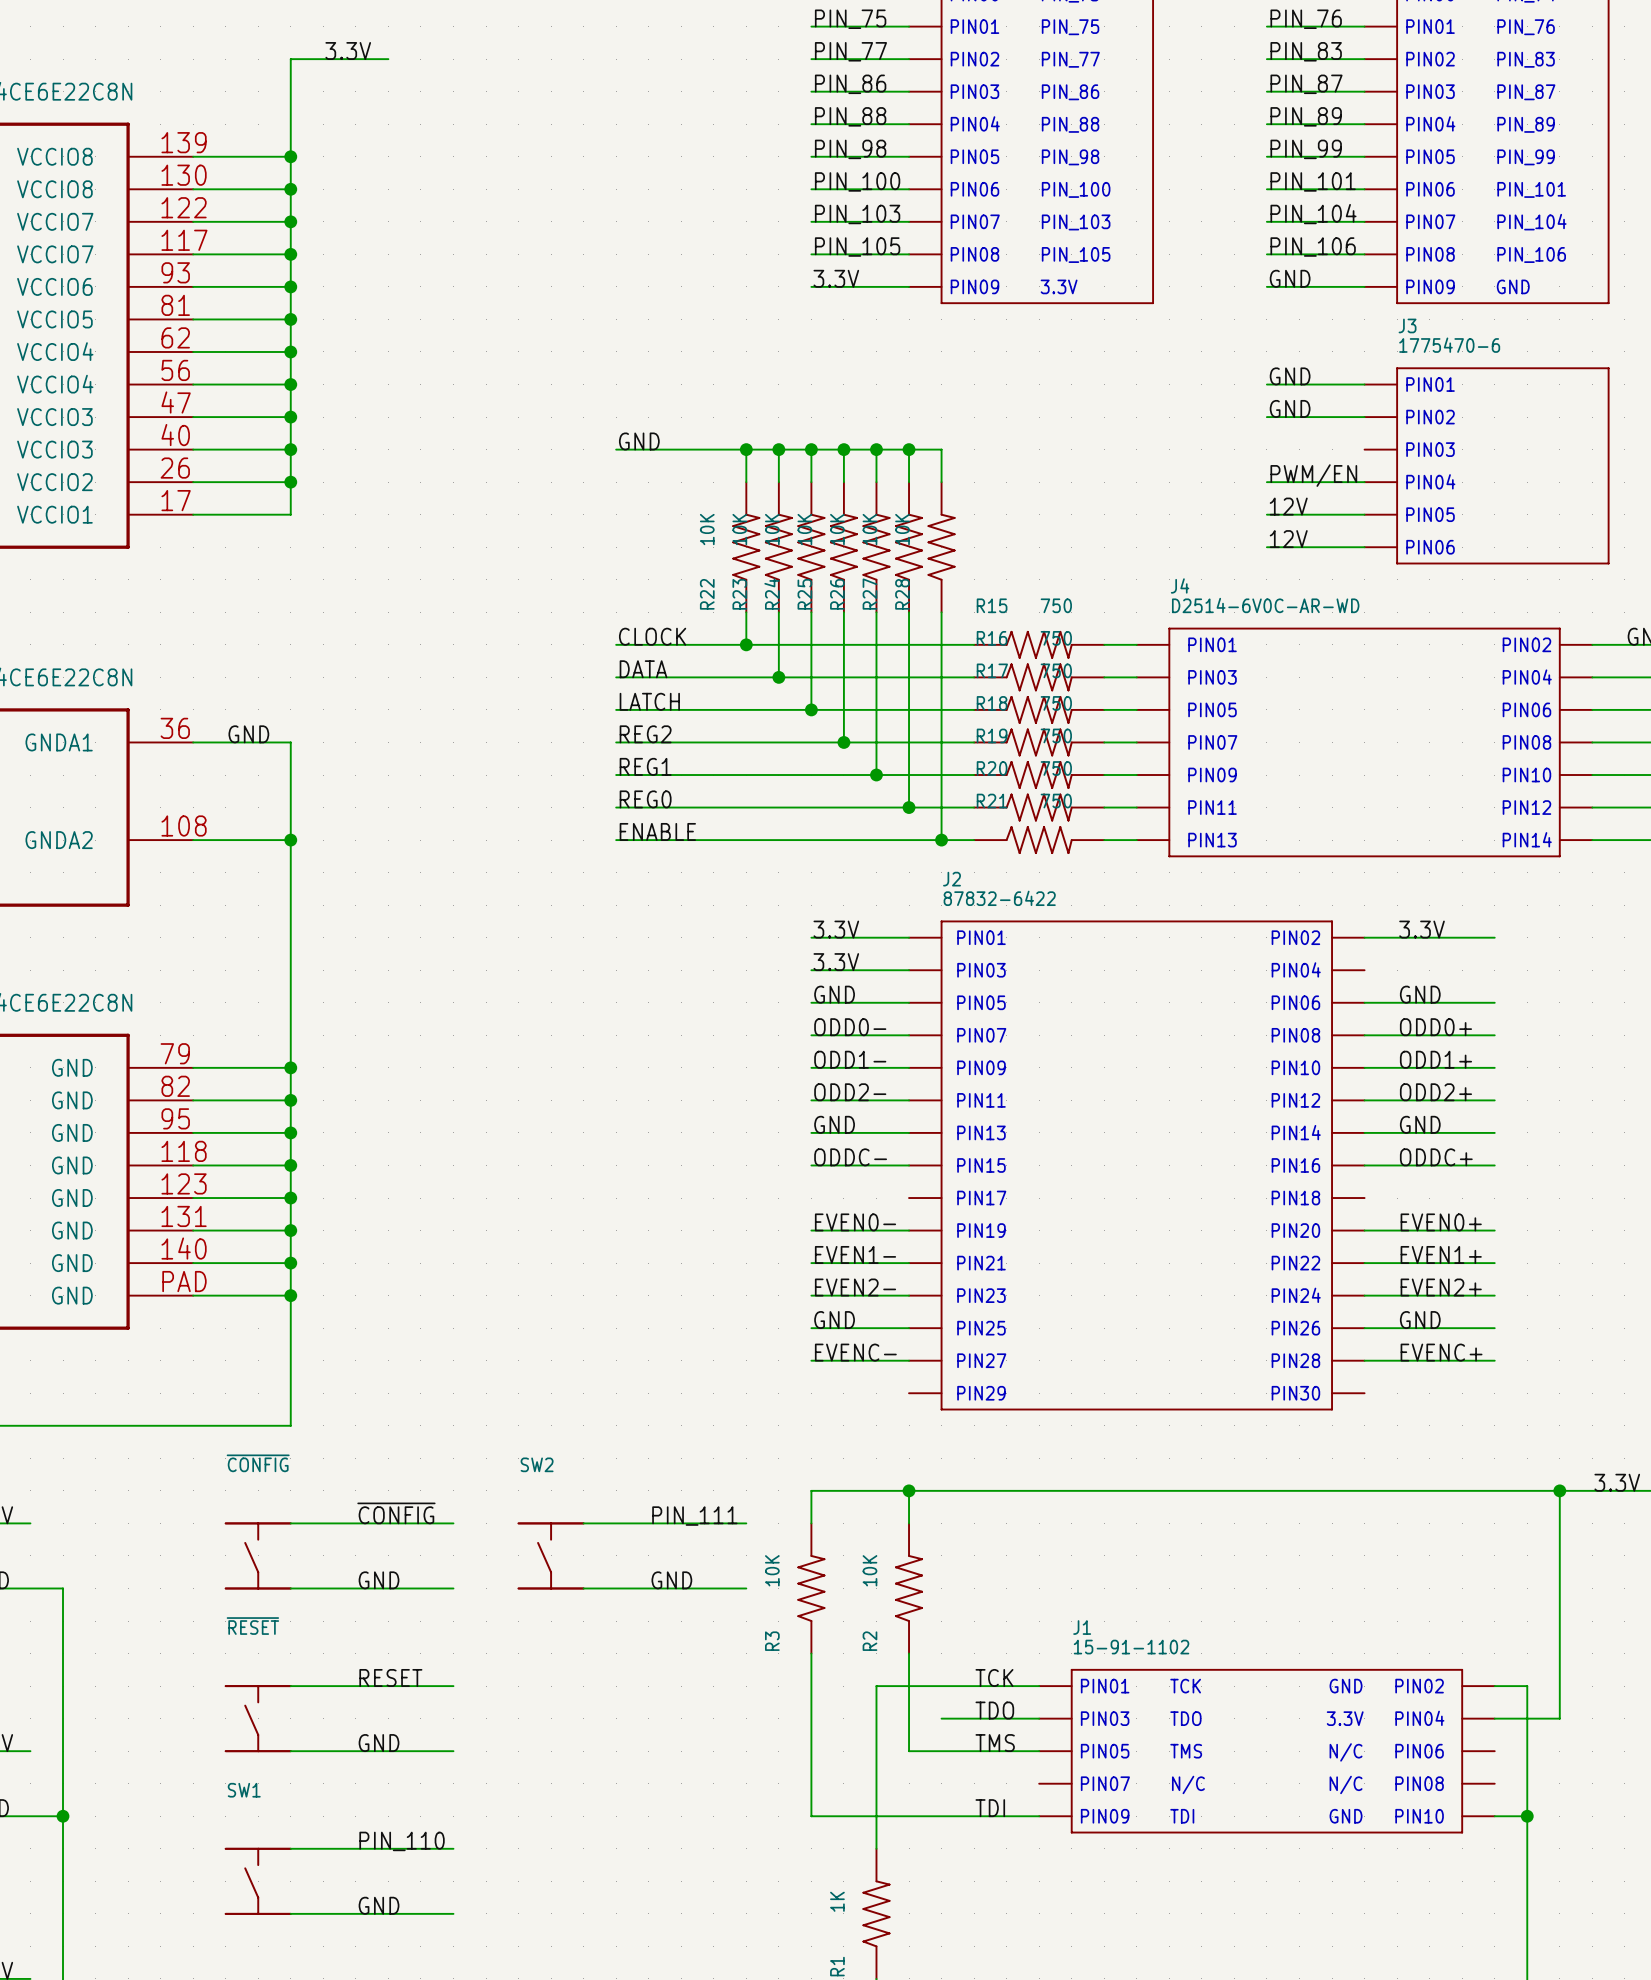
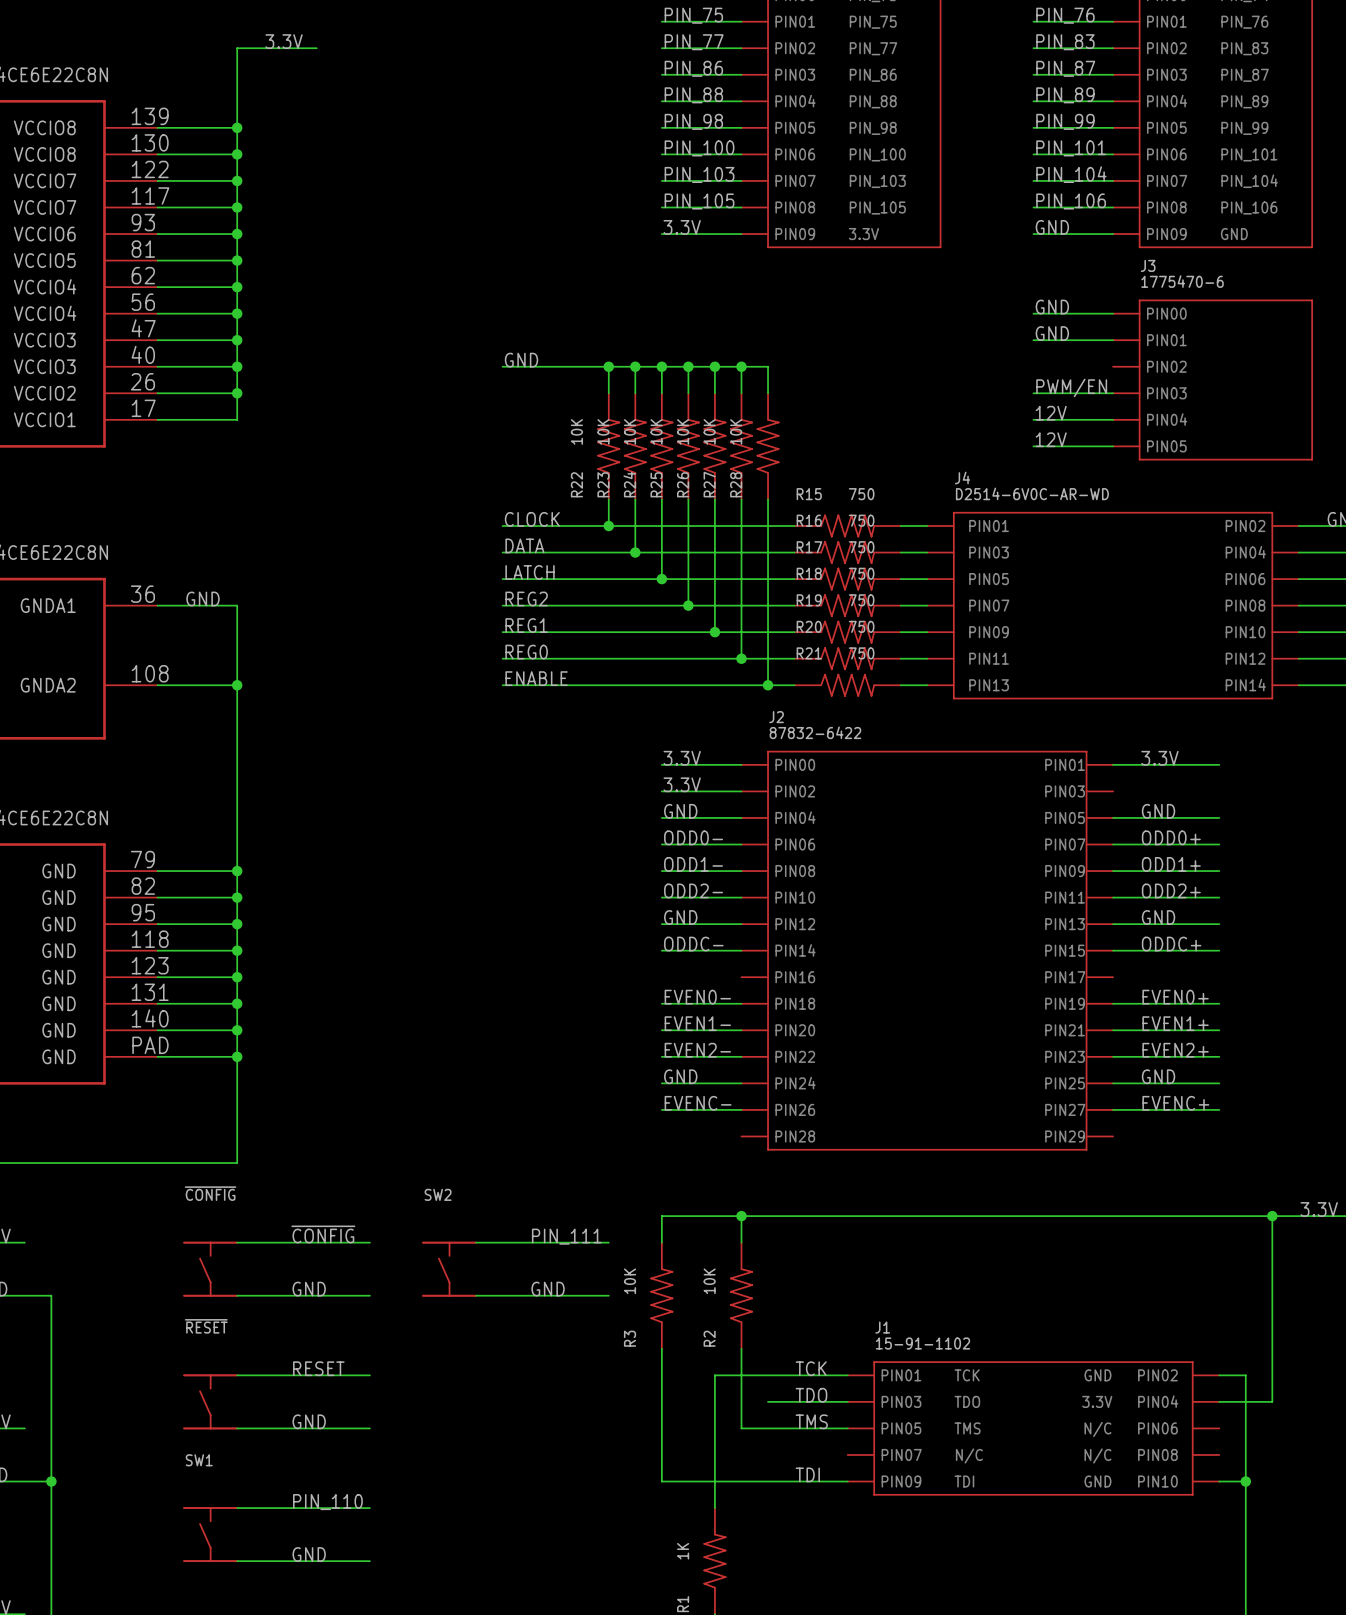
J3 text: PIN01 (1430, 384) -> PIN00 (1166, 313)
J3 text: PIN02 (1430, 417) -> PIN01 (1166, 340)
J3 text: PIN03 (1430, 449) -> PIN02 (1166, 366)
J3 text: PIN04 (1430, 481) -> PIN03 (1166, 393)
J3 text: PIN05 (1430, 514) -> PIN04 (1167, 419)
J3 text: PIN06 (1430, 547) -> PIN05 (1166, 446)
J2 symbol: [909, 920, 1365, 1411] -> [741, 750, 1114, 1151]

